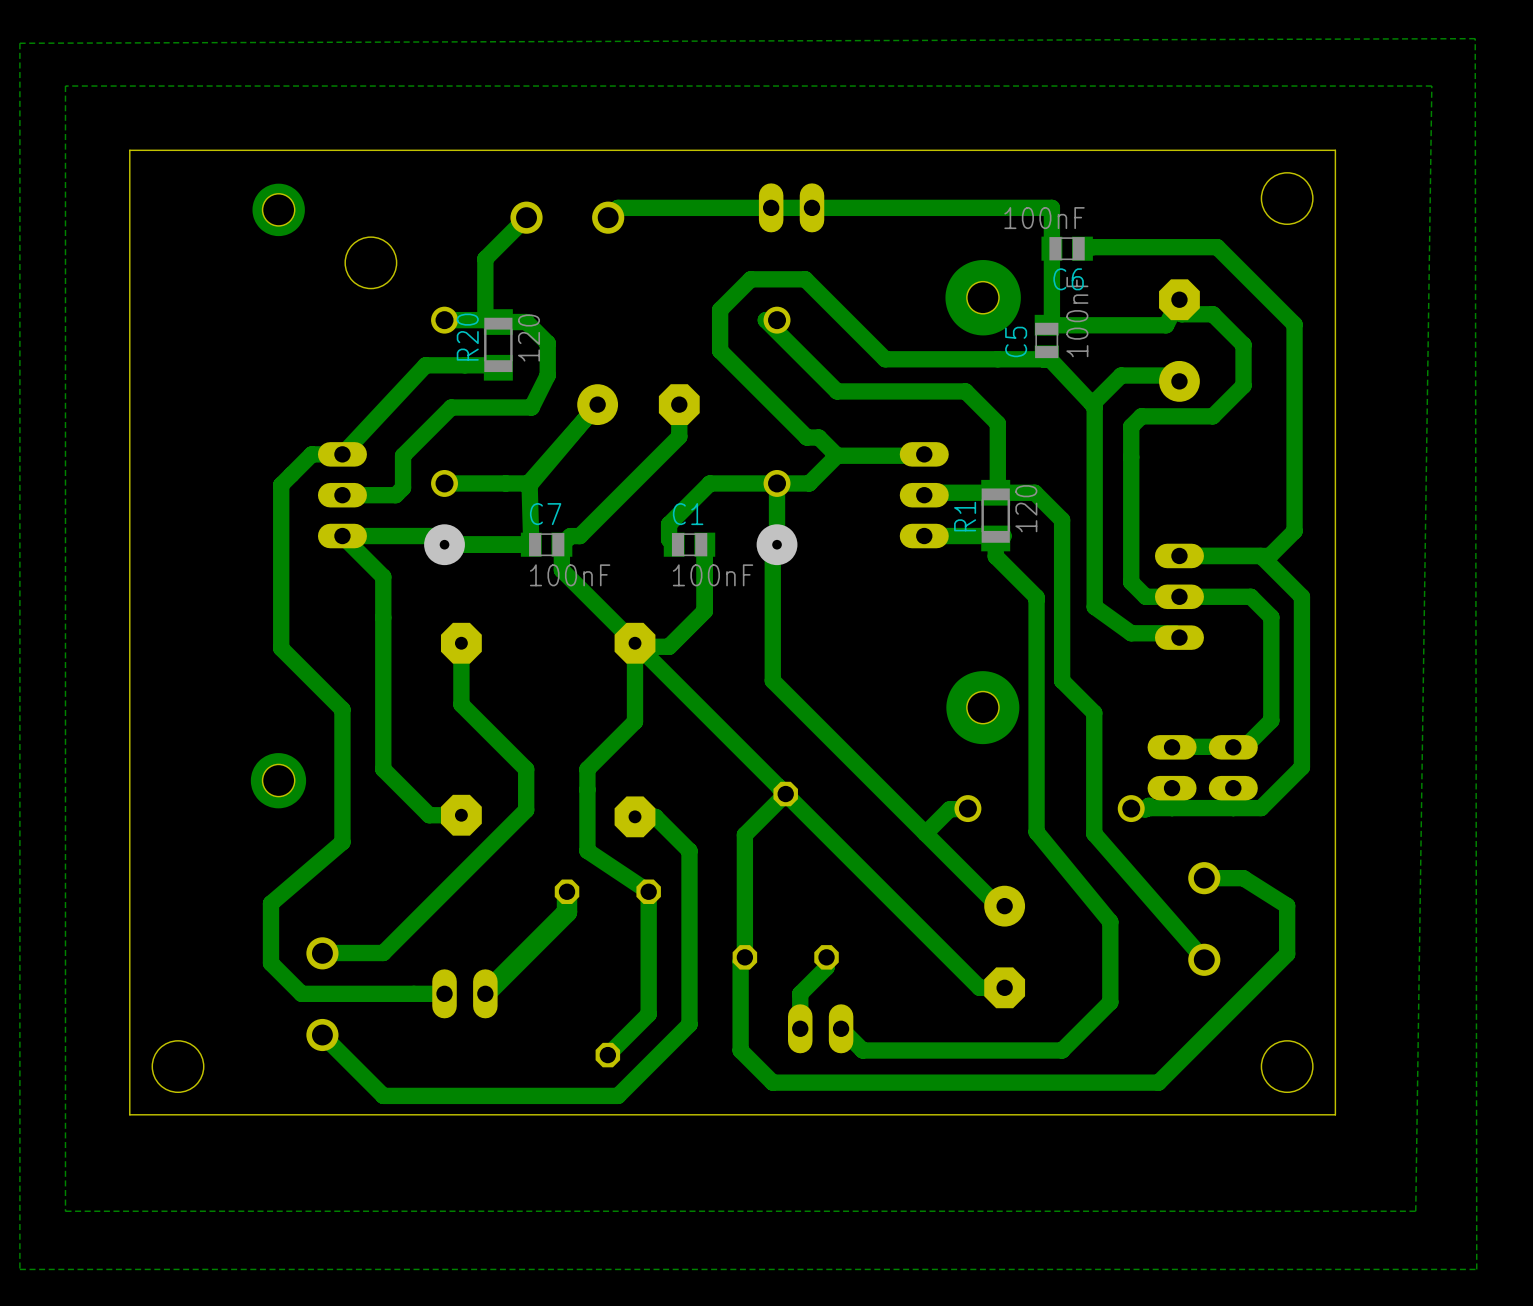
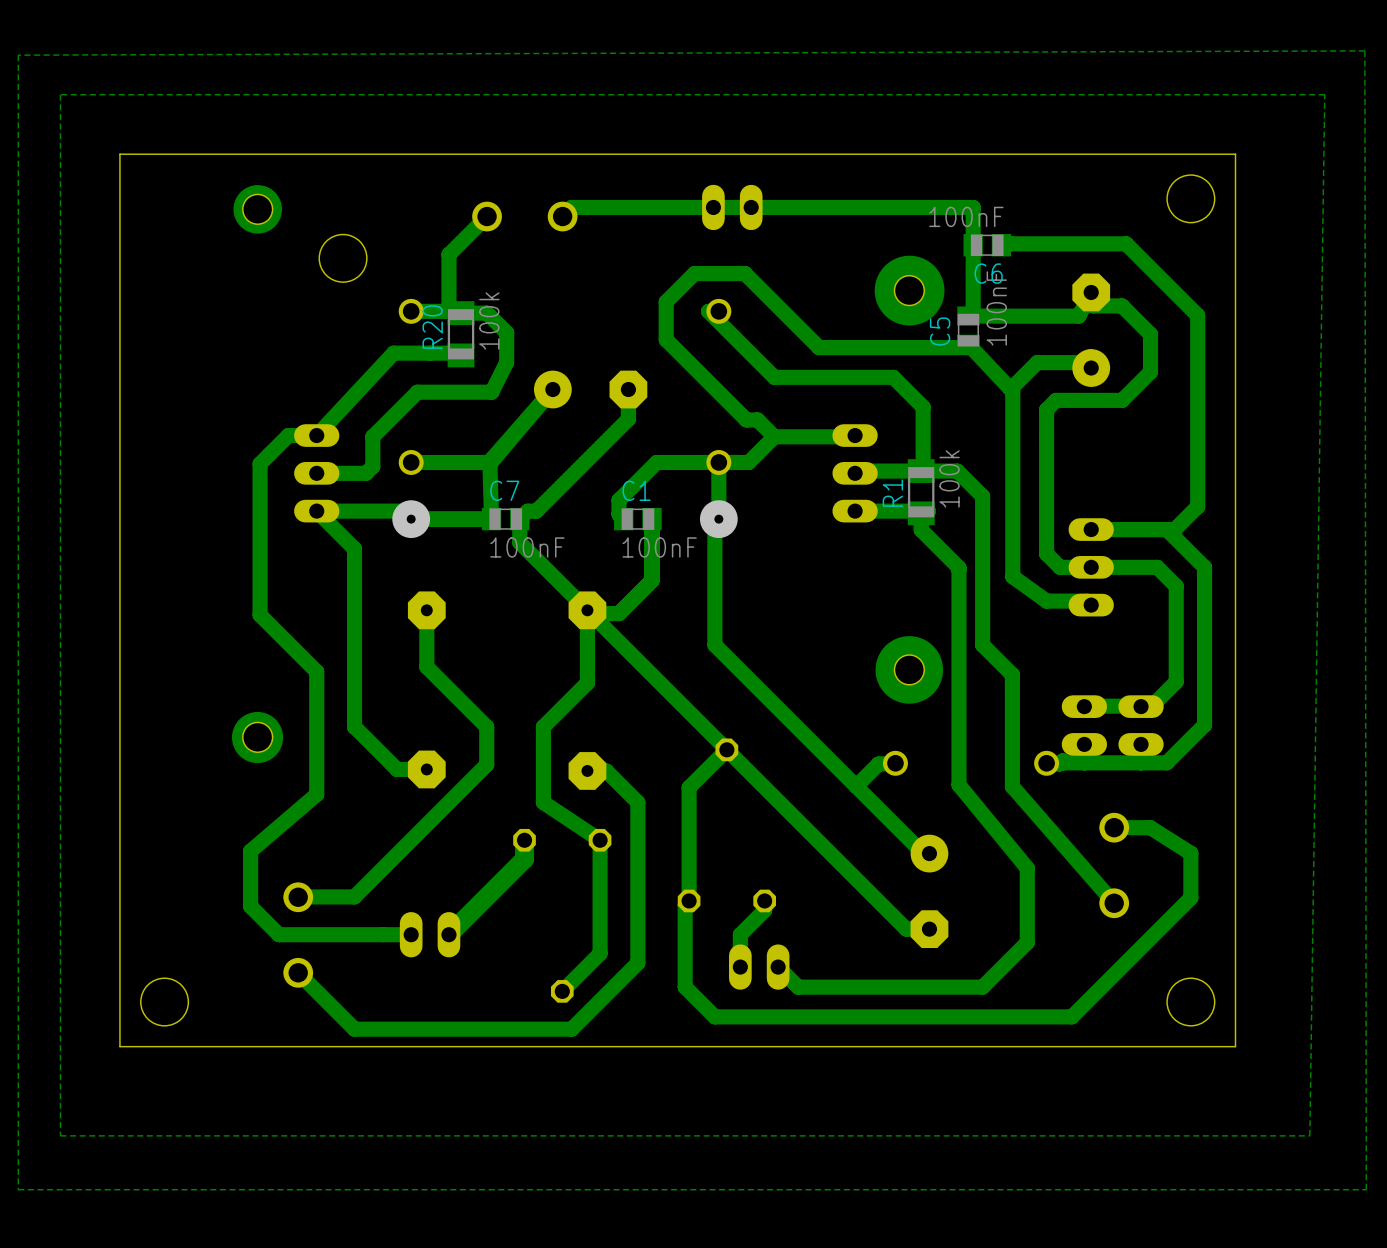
R20 value: 120 (528, 337) -> 100k (489, 320)
R1 value: 120 (1026, 508) -> 100k (949, 478)

